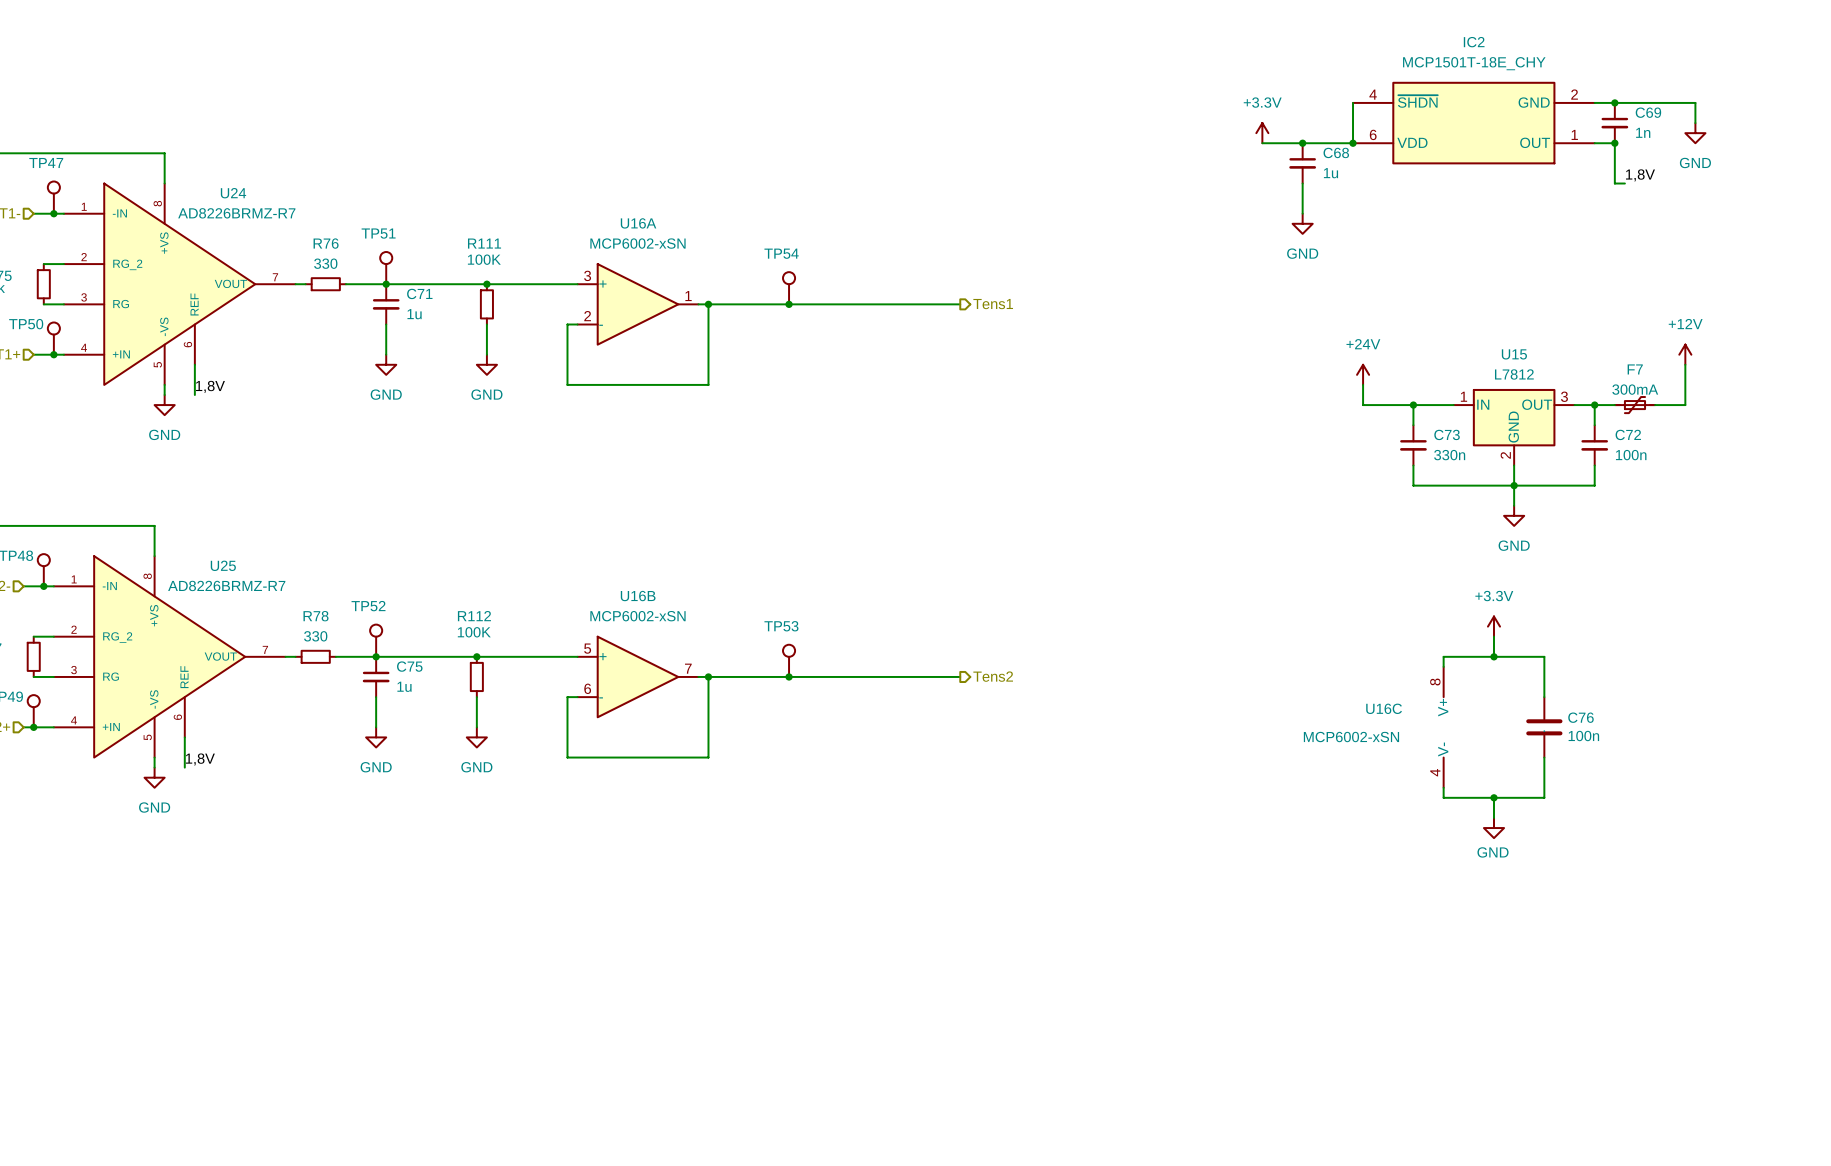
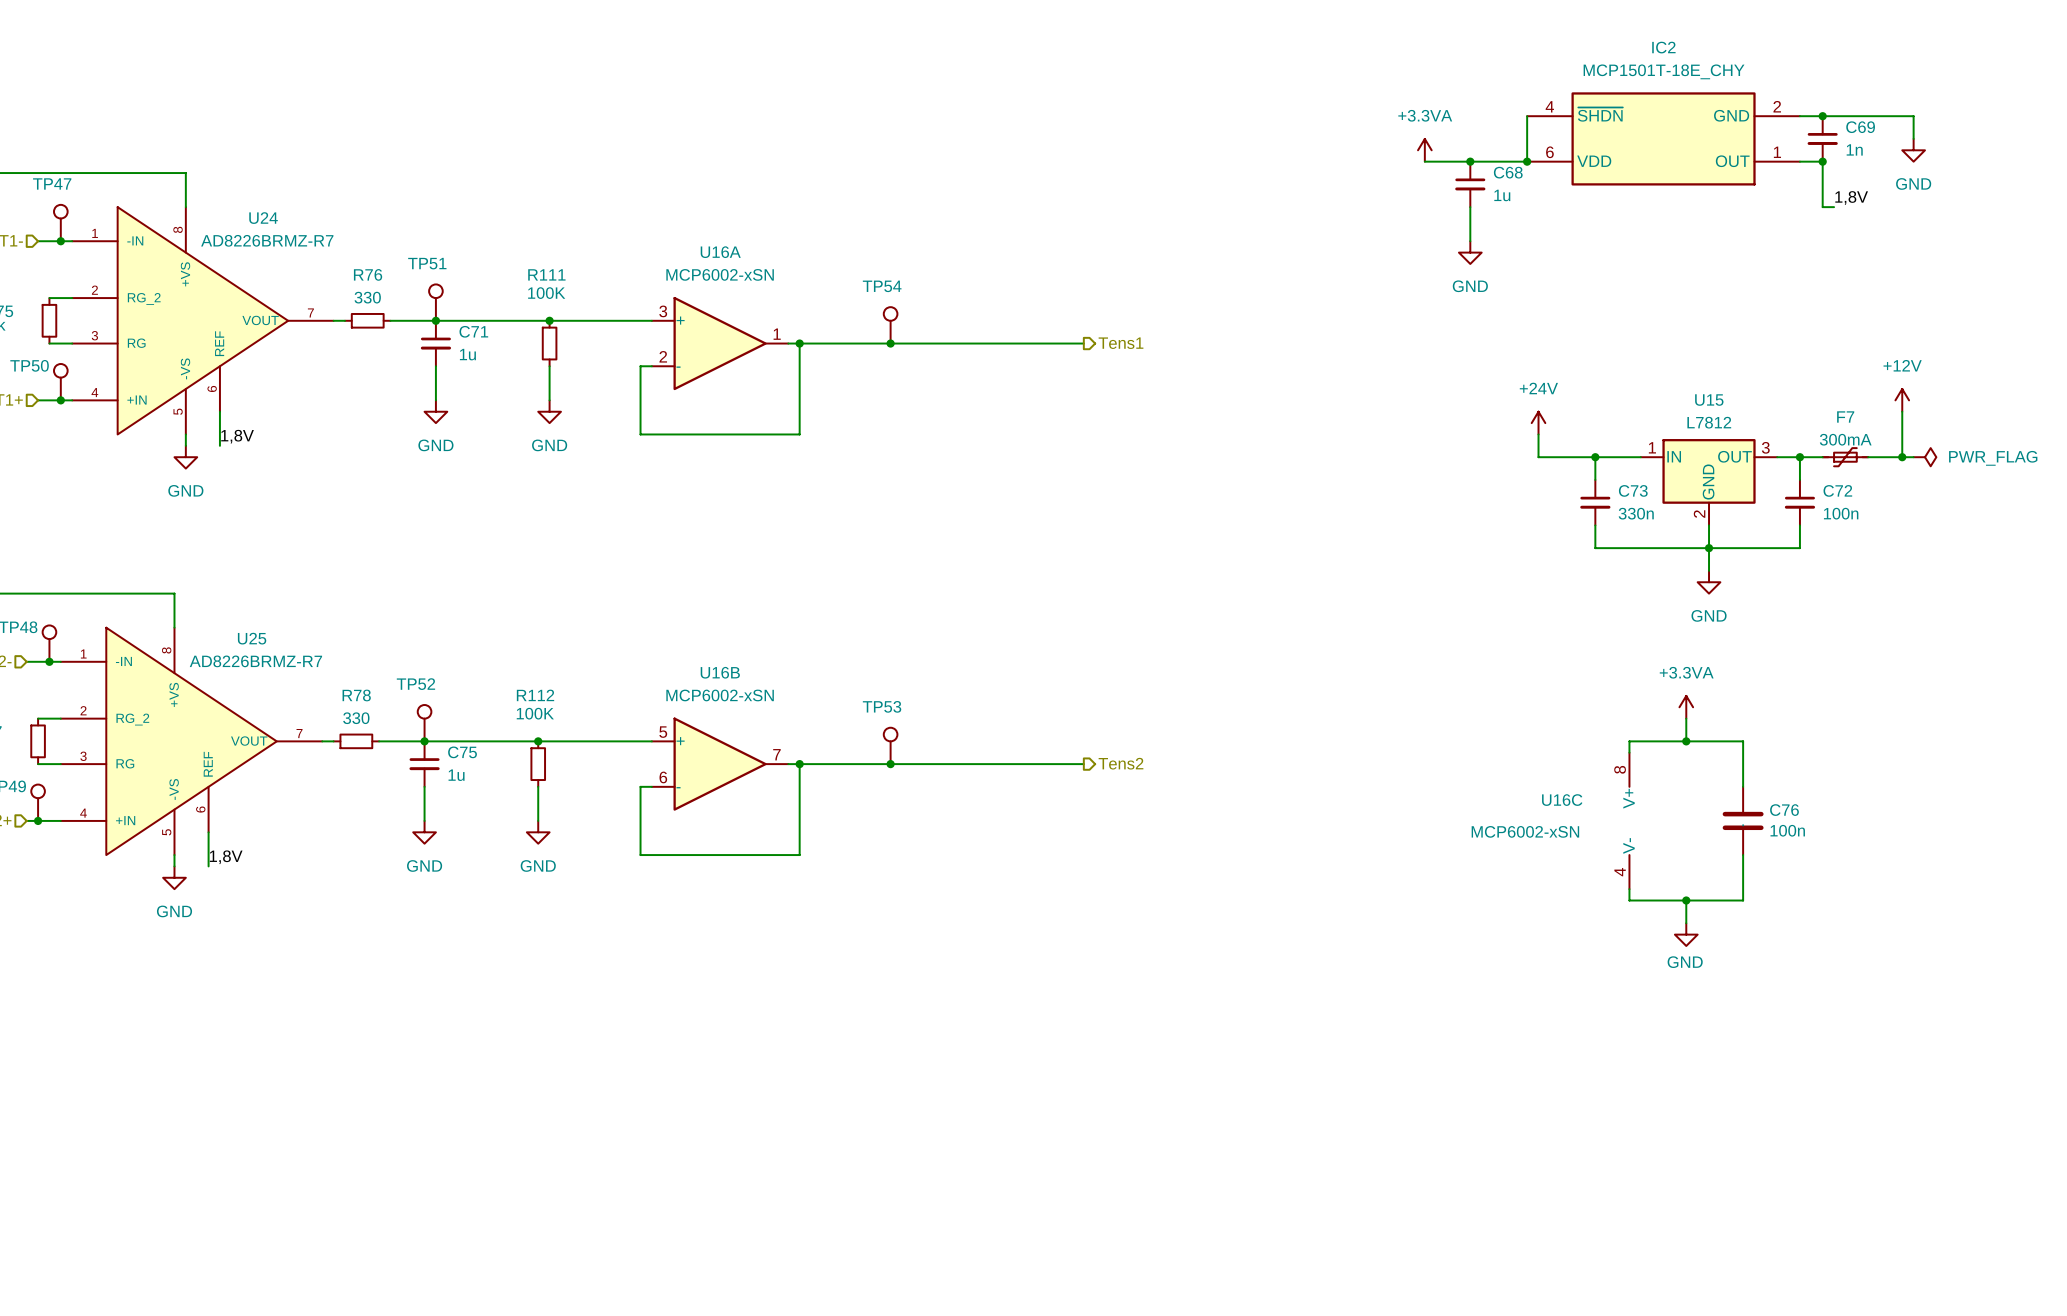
power symbol: +3.3V (1262, 133) -> +3.3VA (1424, 150)
wire: none -> (1902, 457) (1913, 457)
junction: none -> (1902, 457)
power symbol: none -> PWR_FLAG (1924, 457)
power symbol: +3.3V (1493, 626) -> +3.3VA (1686, 707)

